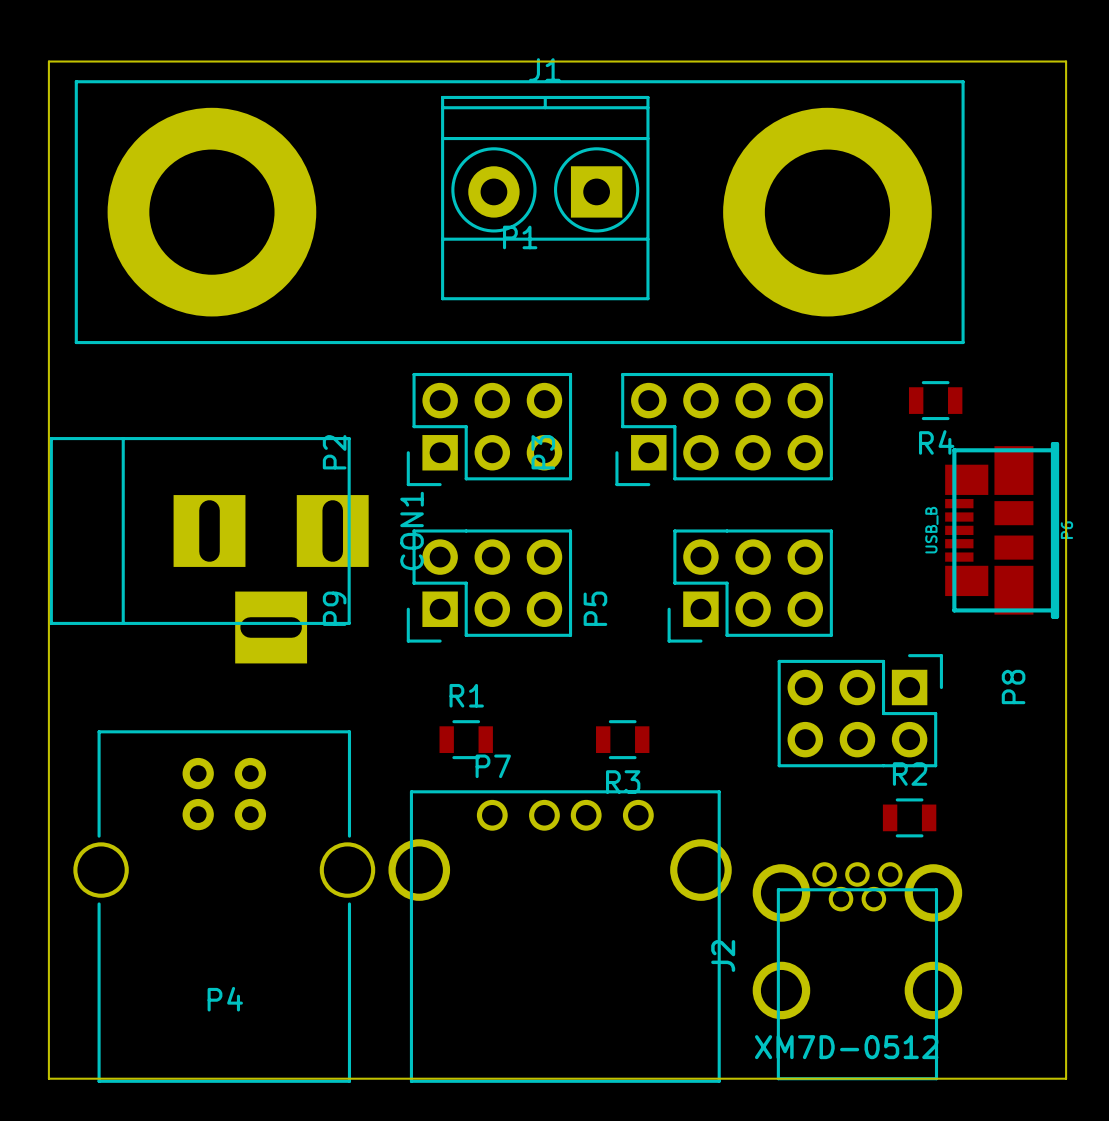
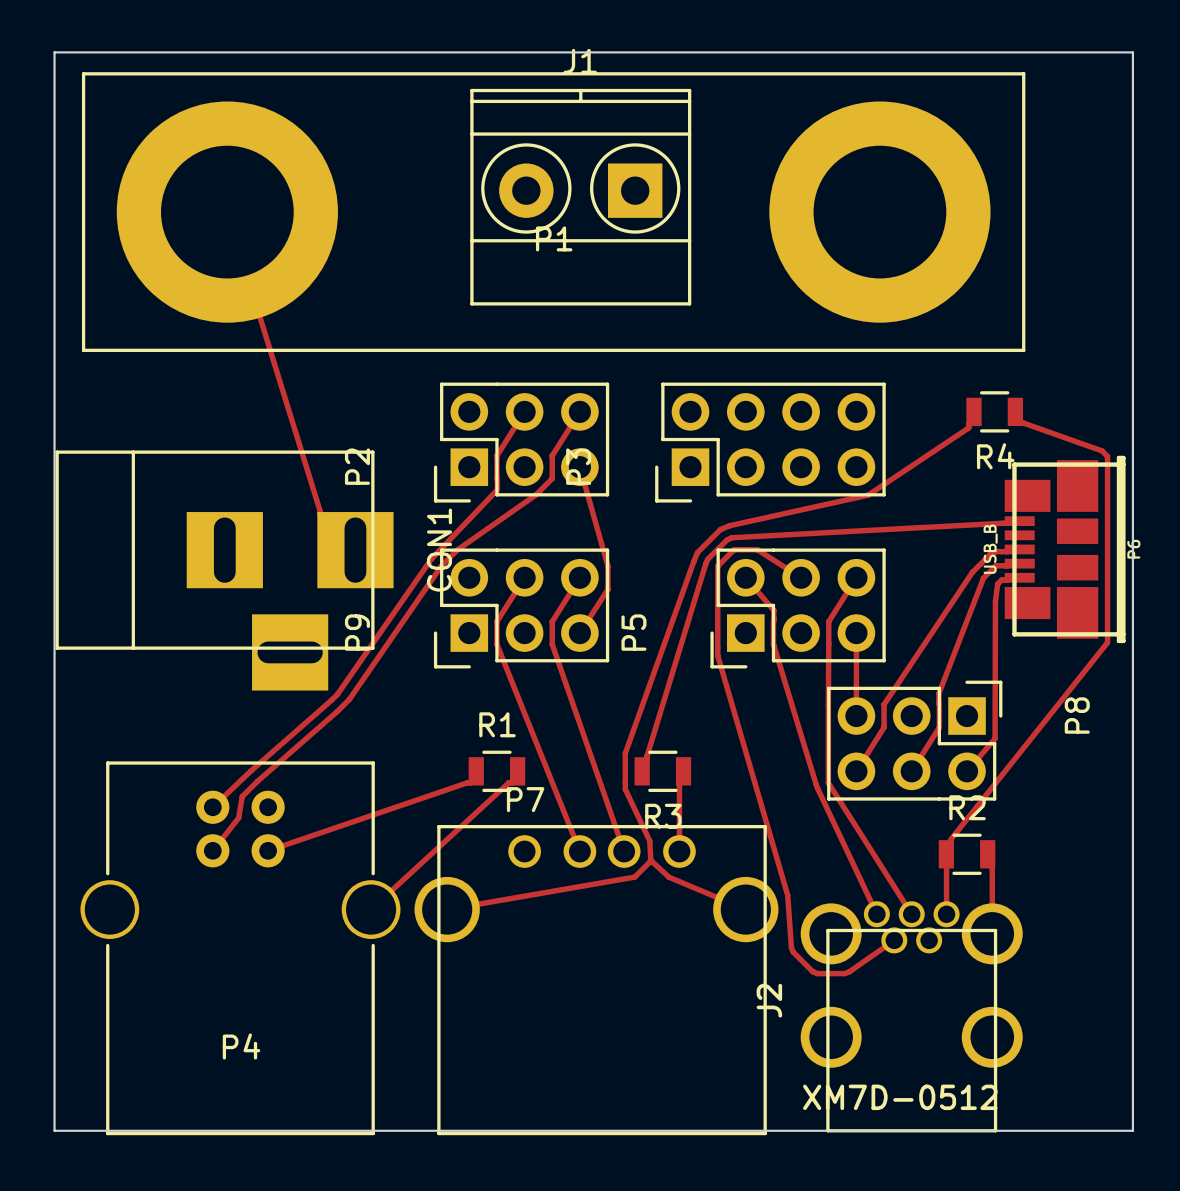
track: none -> (227, 212) (320, 514) (355, 550)
track: none -> (524, 411) (496, 455)
track: none -> (579, 411) (552, 455)
track: none -> (973, 411) (967, 428) (868, 495)
track: none -> (1015, 411) (1020, 423) (1102, 450) (1107, 456) (1107, 642) (951, 839) (946, 854) (946, 914)
track: none -> (496, 455) (497, 489) (431, 559) (337, 694) (212, 807)
track: none -> (552, 455) (552, 478)
track: none -> (579, 467) (607, 566) (607, 589)
track: none -> (552, 478) (536, 494) (457, 549) (441, 566) (349, 699) (242, 796) (238, 817) (212, 850)
track: none -> (867, 495) (729, 525) (720, 529) (697, 552) (625, 753) (625, 789) (649, 840) (650, 860)
track: none -> (1019, 521) (731, 537) (727, 539) (707, 559) (705, 563) (642, 771)
track: none -> (734, 549) (717, 566)
track: none -> (734, 549) (757, 549)
track: none -> (757, 549) (801, 577)
track: none -> (1019, 549) (995, 551) (990, 554) (972, 572) (884, 704)
track: none -> (1019, 563) (995, 565) (983, 578) (938, 693) (939, 727)
track: none -> (717, 566) (717, 655) (787, 895) (793, 952) (812, 971) (817, 973) (844, 973) (894, 940)
track: none -> (524, 577) (496, 621)
track: none -> (579, 577) (552, 621)
track: none -> (745, 577) (773, 610) (773, 644) (816, 785) (876, 914)
track: none -> (856, 577) (828, 621)
track: none -> (1019, 577) (1001, 579) (997, 584) (995, 601) (995, 738) (967, 771)
track: none -> (607, 589) (579, 633)
track: none -> (496, 621) (496, 644) (579, 851)
track: none -> (552, 621) (552, 644) (624, 851)
track: none -> (828, 621) (828, 782)
track: none -> (856, 633) (856, 716)
track: none -> (884, 704) (884, 727)
track: none -> (884, 727) (856, 771)
track: none -> (939, 727) (911, 771)
track: none -> (476, 771) (471, 782) (268, 850)
track: none -> (517, 771) (512, 782) (508, 782) (371, 909)
track: none -> (683, 771) (679, 782) (679, 851)
track: none -> (828, 783) (911, 914)
track: none -> (987, 854) (992, 865) (992, 933)
track: none -> (650, 860) (634, 877) (447, 909)
track: none -> (650, 860) (668, 877) (745, 909)

